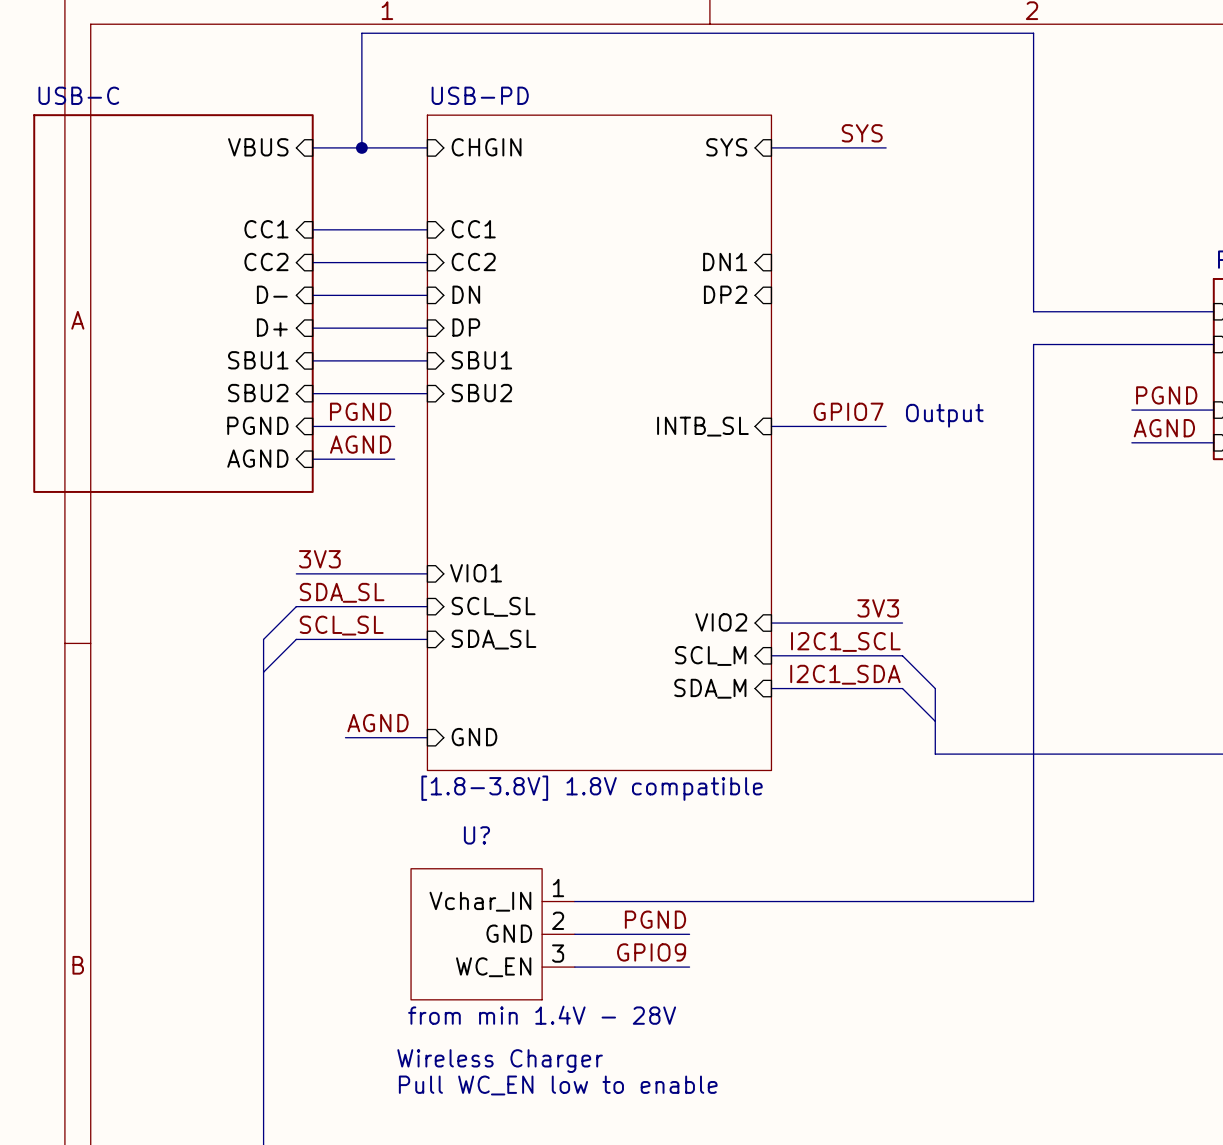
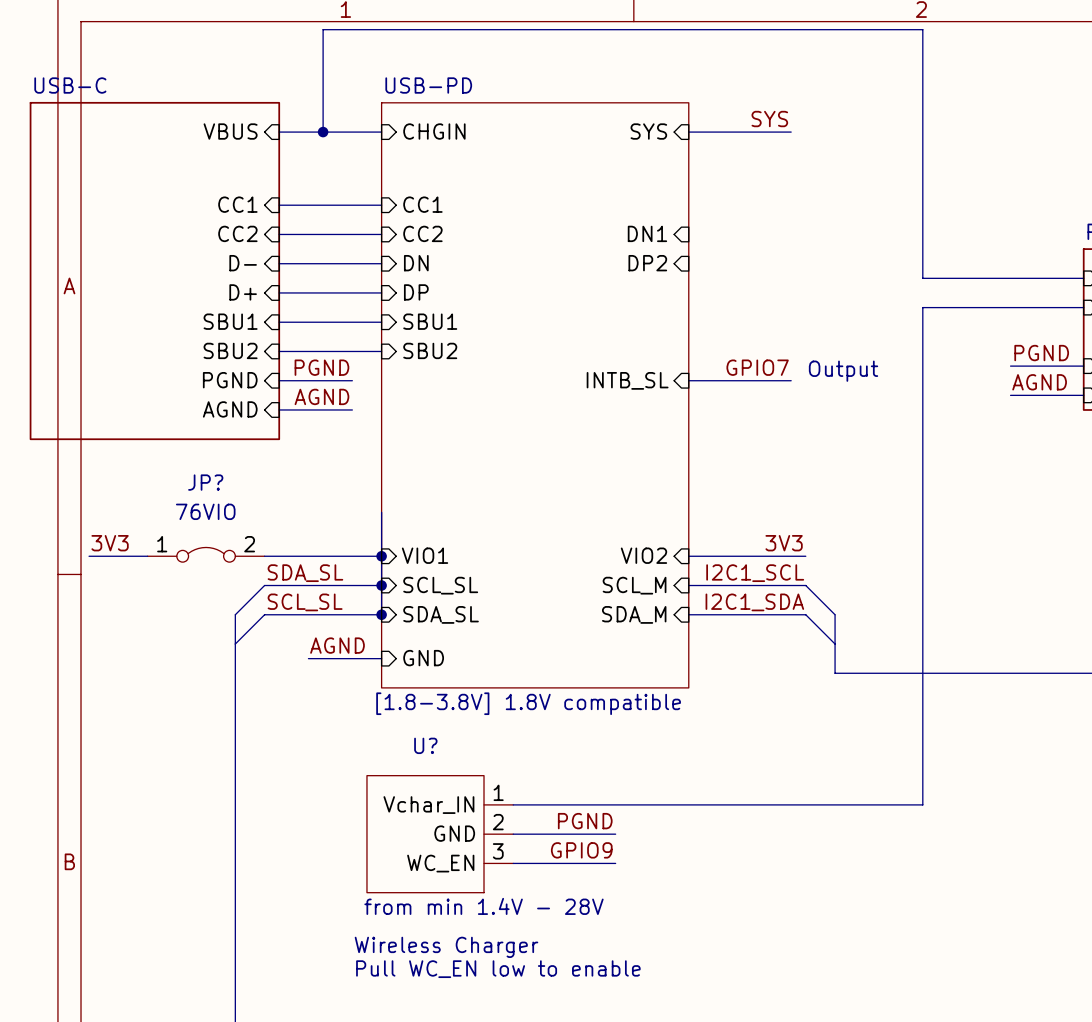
label position: 3V3 (319, 559) -> 3V3 (110, 543)
wire: (296, 573) (427, 573) -> (235, 644) (264, 614) (381, 614) (381, 512)
sheet pin position: VIO1 (476, 573) -> VIO1 (425, 555)
label position: SDA_SL (342, 592) -> SDA_SL (305, 573)
wire: (427, 606) (296, 606) (263, 639) -> (381, 585) (264, 585) (235, 614)
sheet pin position: SCL_SL (493, 606) -> SCL_SL (440, 585)
JP?: none -> 76VIO (206, 554)
wire: none -> (89, 556) (147, 556)
wire: none -> (264, 556) (381, 556)
junction: none -> (381, 556)
label position: SCL_SL (341, 625) -> SCL_SL (305, 602)
bus: (263, 639) (263, 688) -> none
wire: (427, 639) (296, 639) (263, 672) -> none
sheet pin position: SDA_SL (493, 639) -> SDA_SL (441, 614)
junction: none -> (381, 585)
junction: none -> (381, 614)

